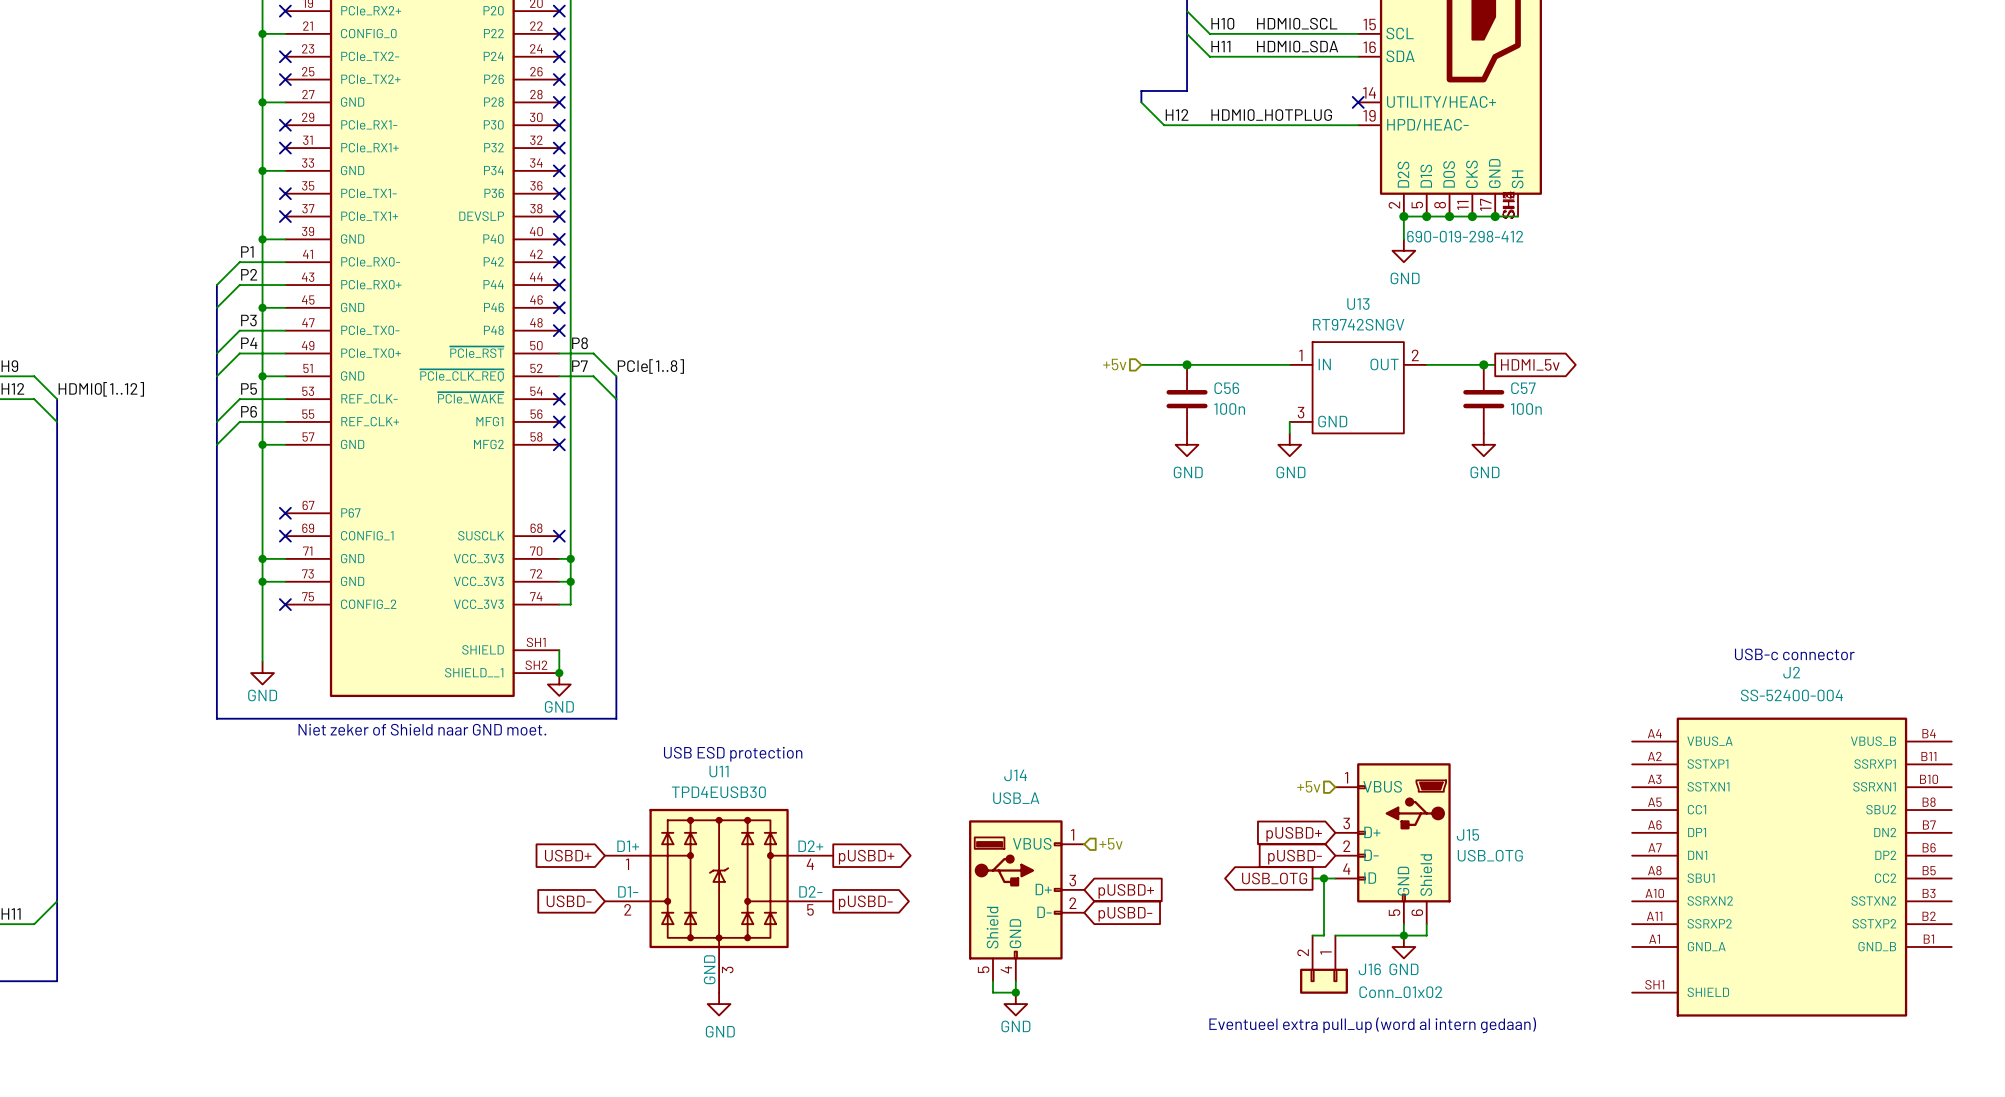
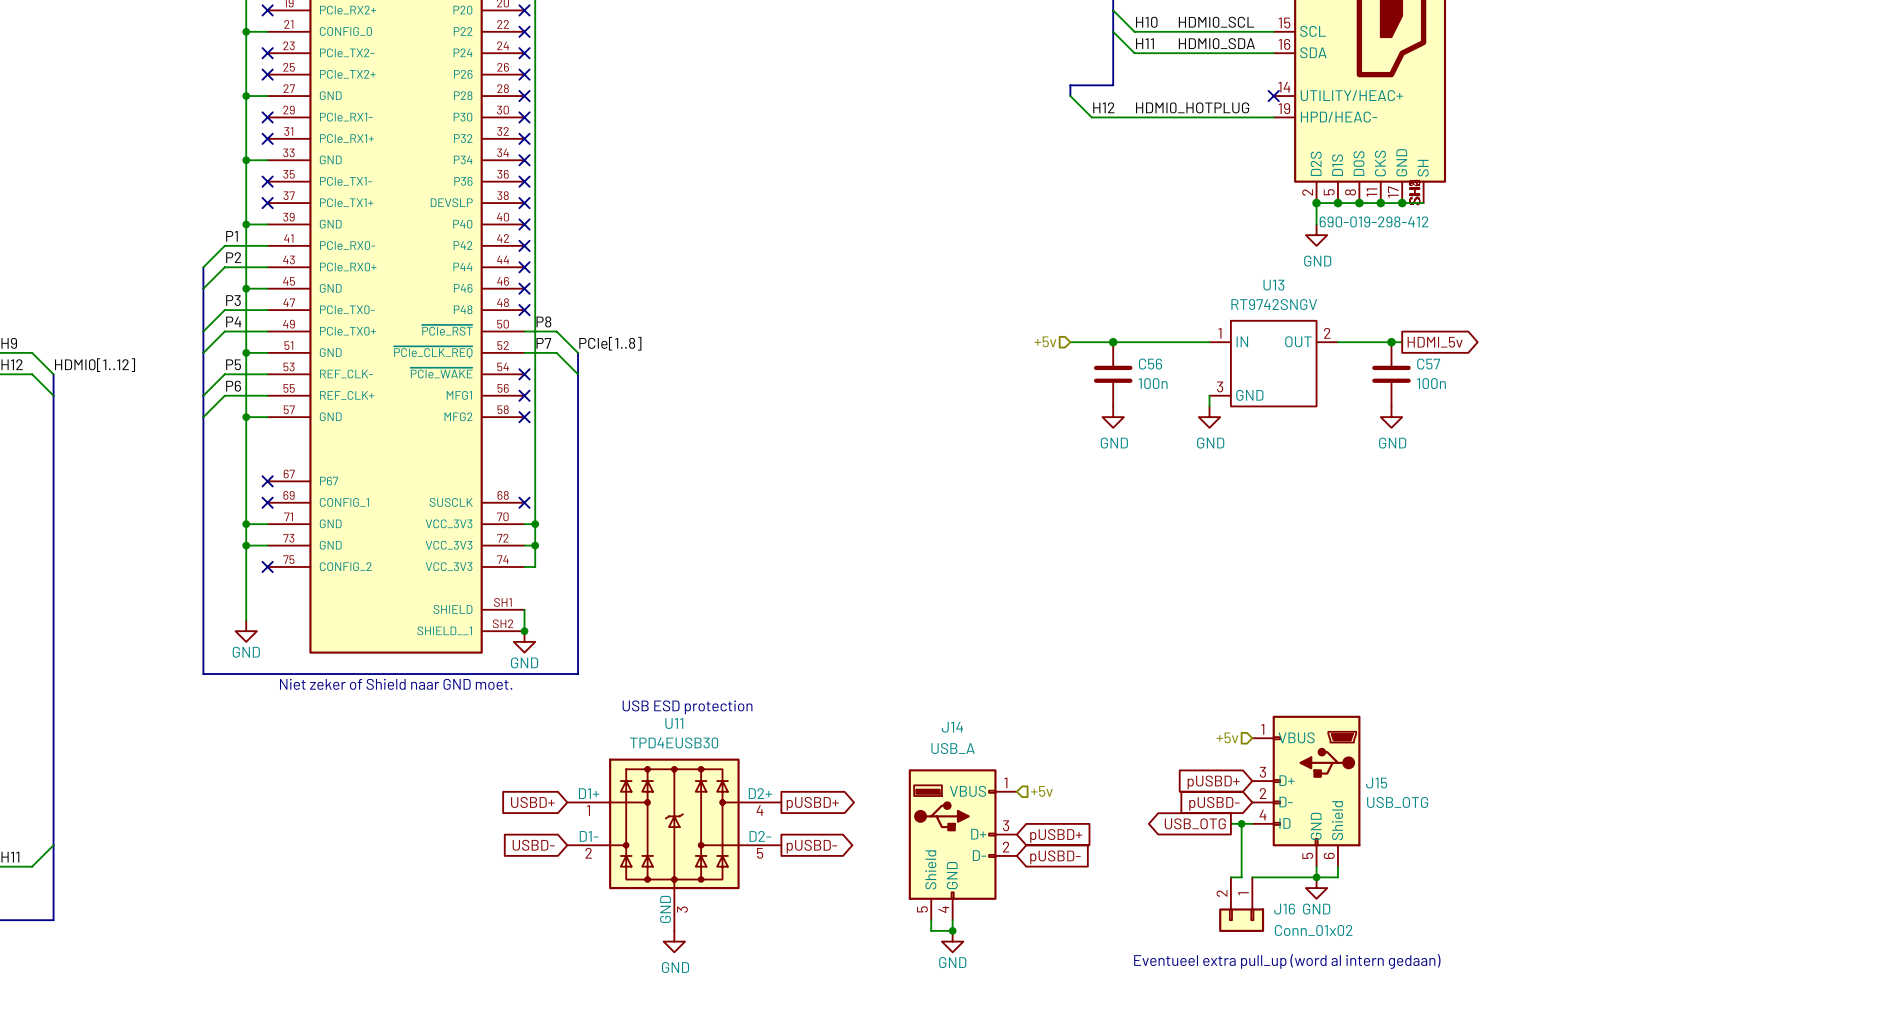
text: USB-c connector (1794, 654) -> none
J2: SS-52400-004 (1791, 867) -> none

